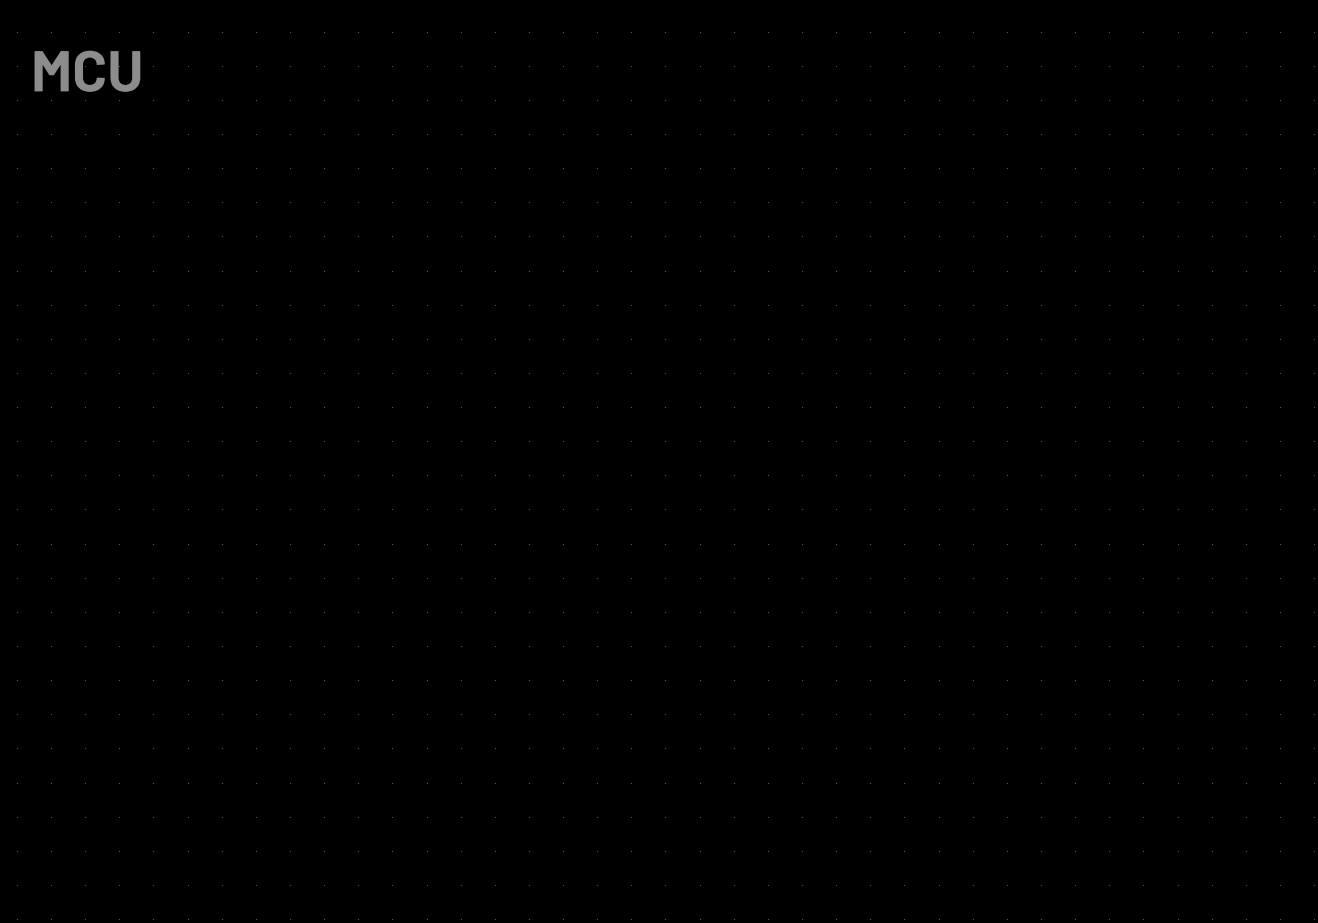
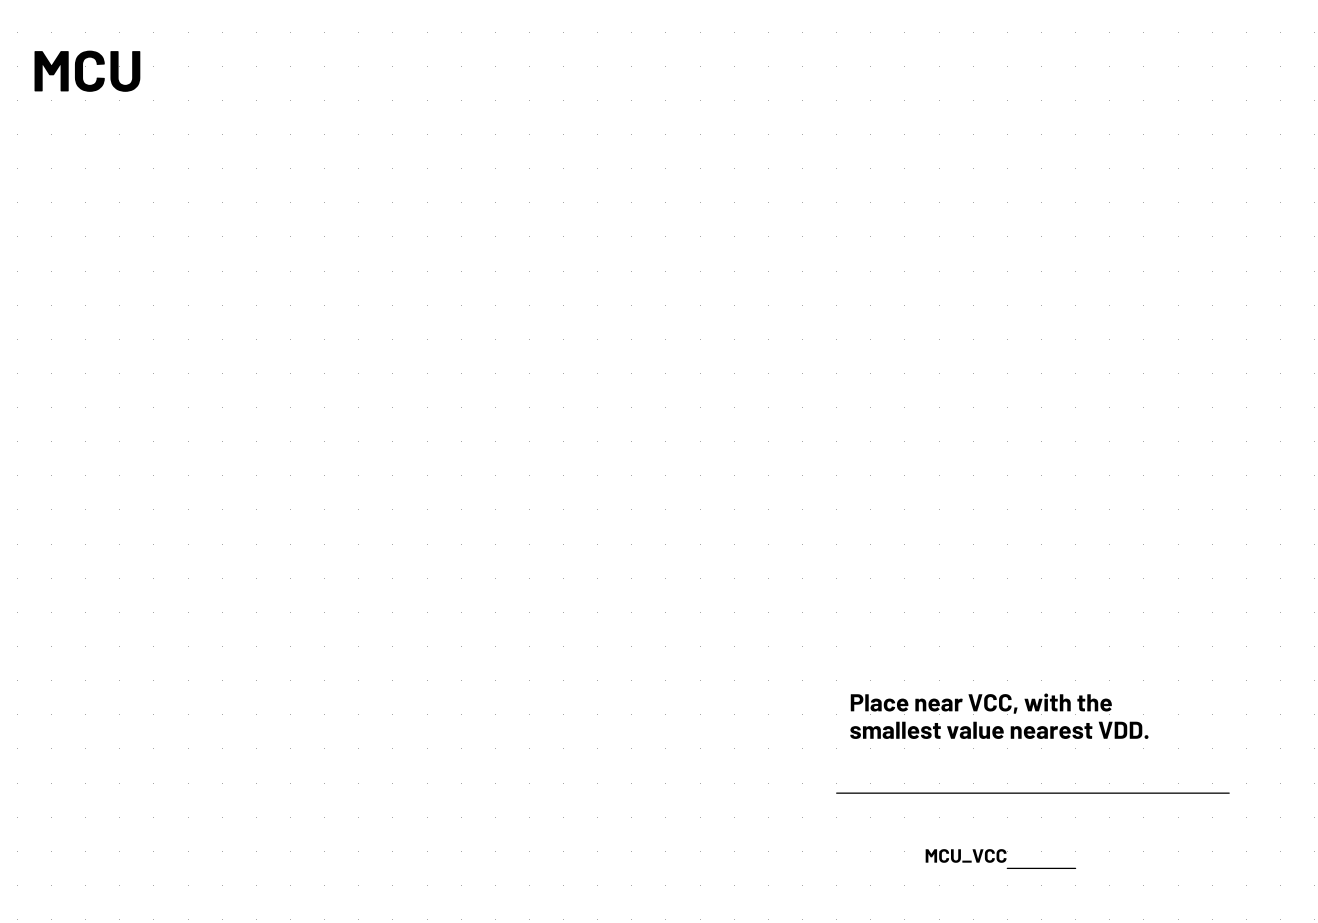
text: none -> Place near VCC, with the (981, 703)
text: none -> smallest value nearest VDD. (999, 730)
line: none -> (836, 793) (1229, 793)
label: none -> MCU_VCC (966, 855)
wire: none -> (1007, 868) (1075, 868)

